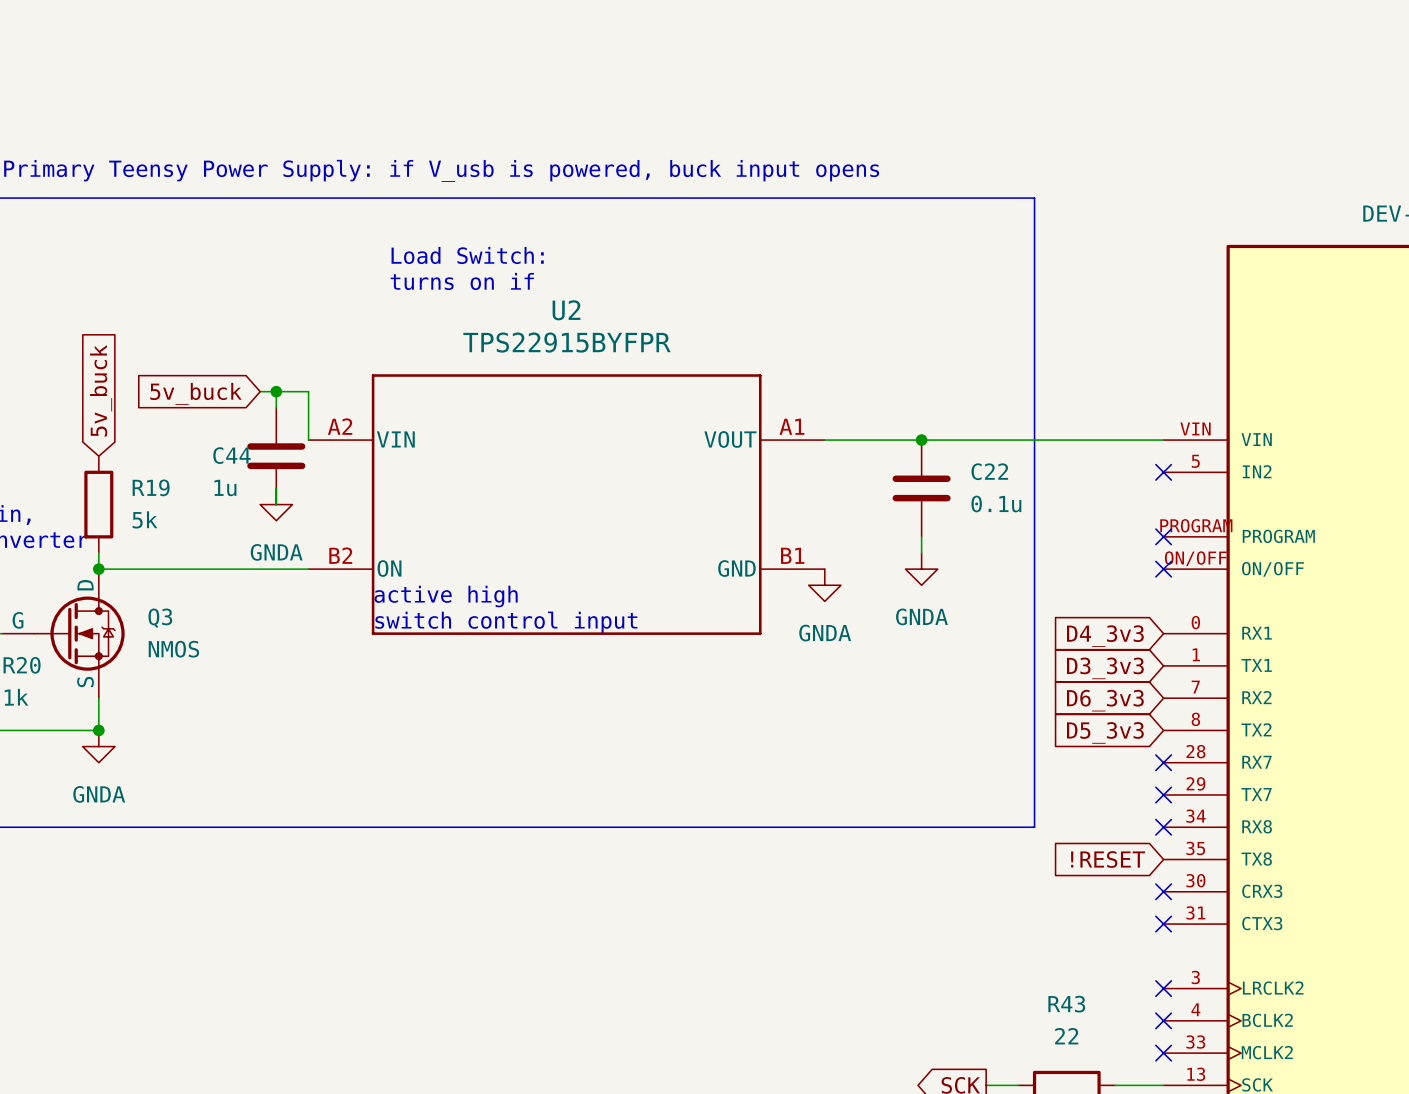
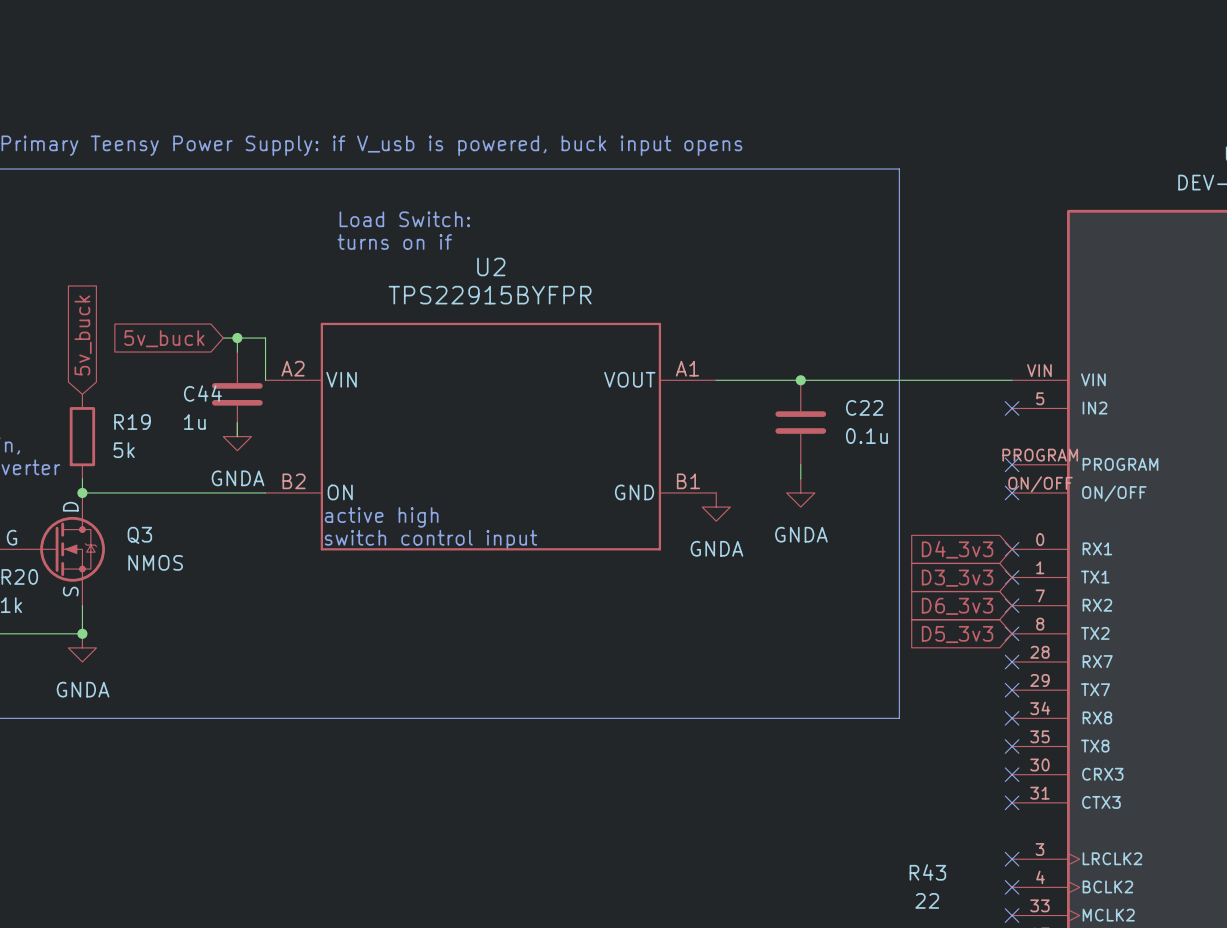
no-connect mark: none -> (1012, 549)
no-connect mark: none -> (1012, 577)
no-connect mark: none -> (1012, 605)
no-connect mark: none -> (1012, 633)
global label: !RESET (1108, 859) -> none
no-connect mark: none -> (1012, 746)

